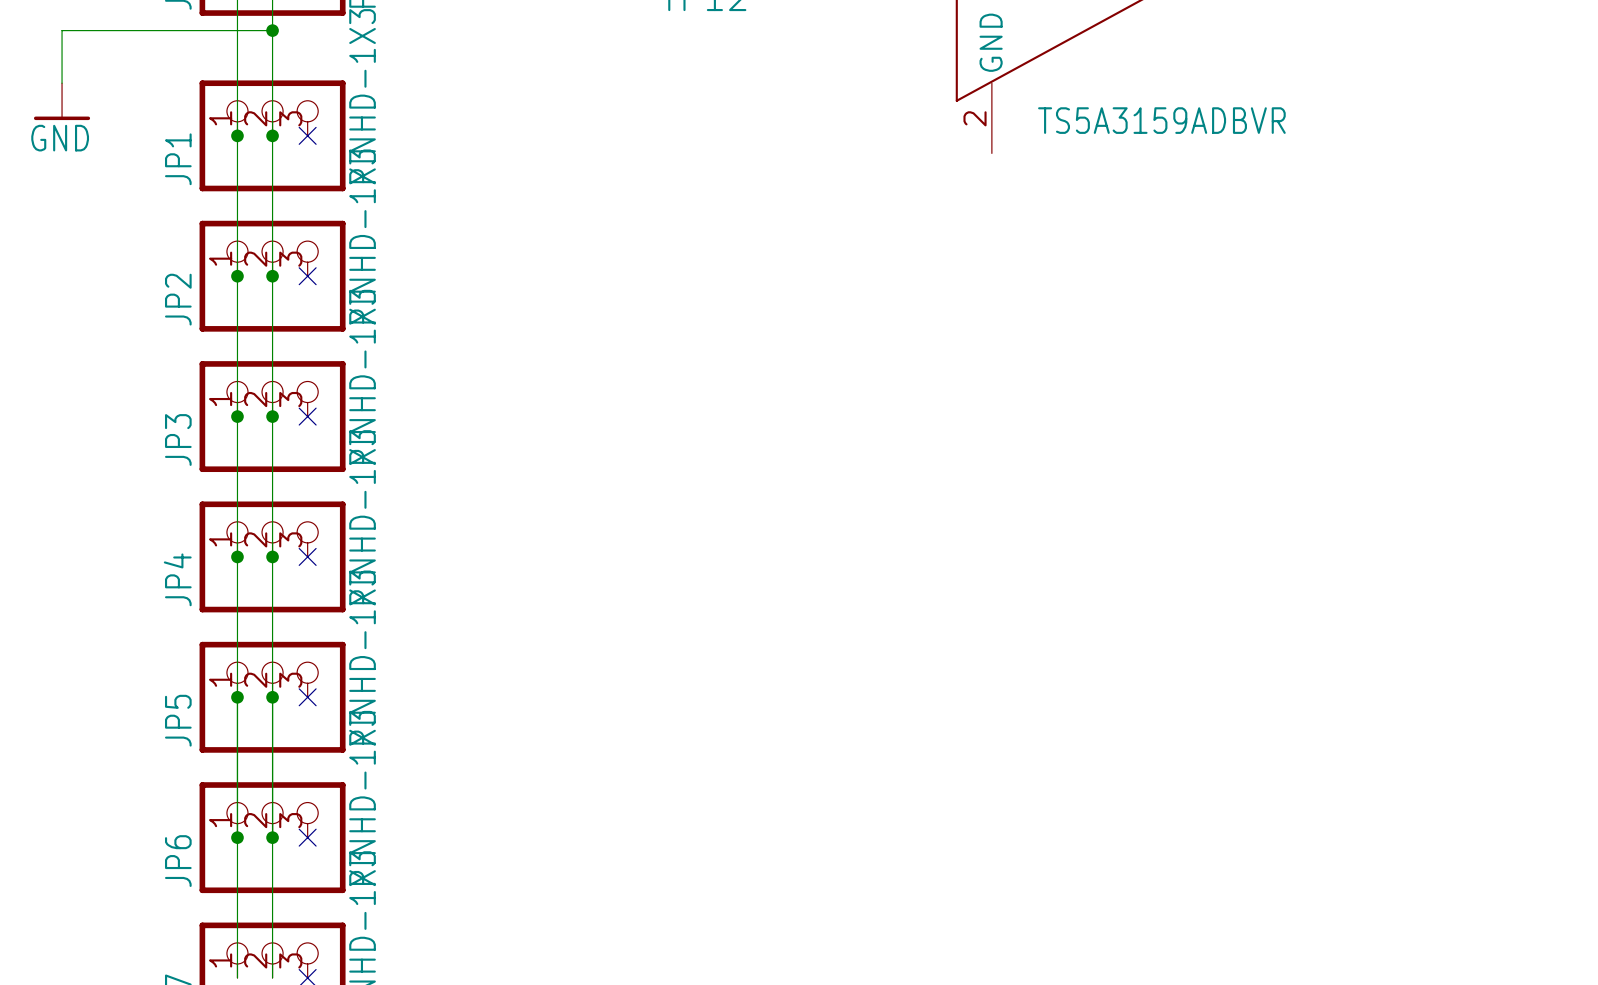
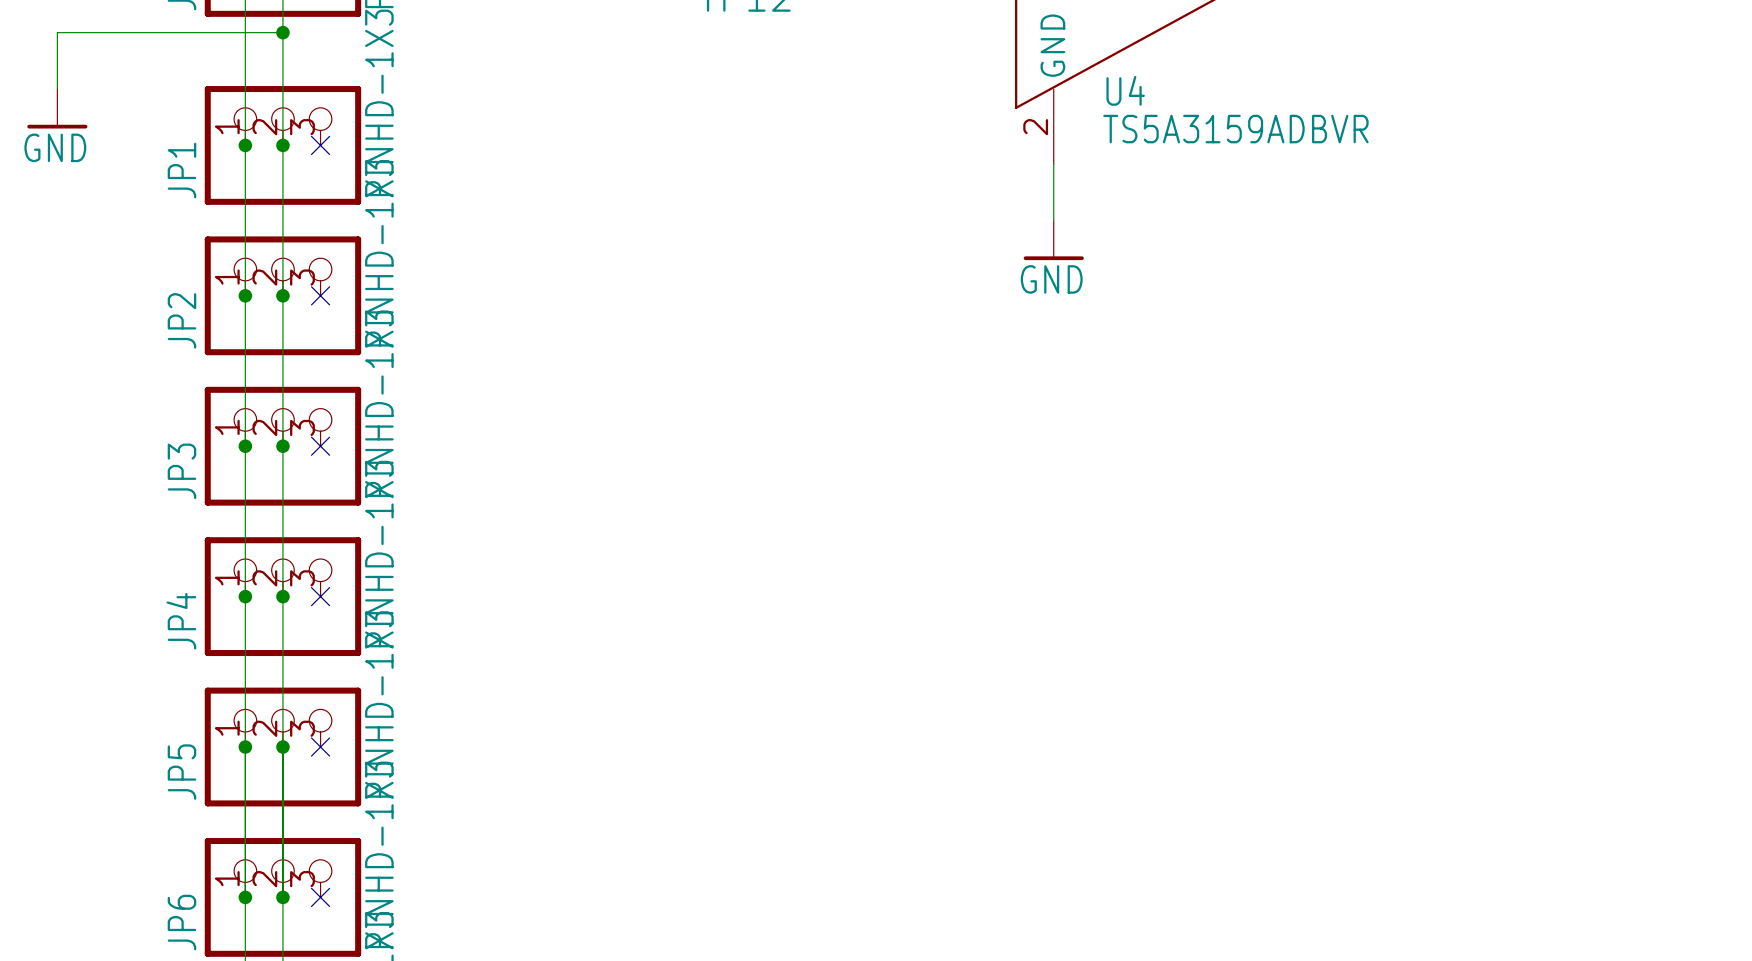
U4 name: none -> U4 (1125, 90)
wire: none -> (1053, 164) (1053, 220)
power symbol: none -> GND (1053, 240)

